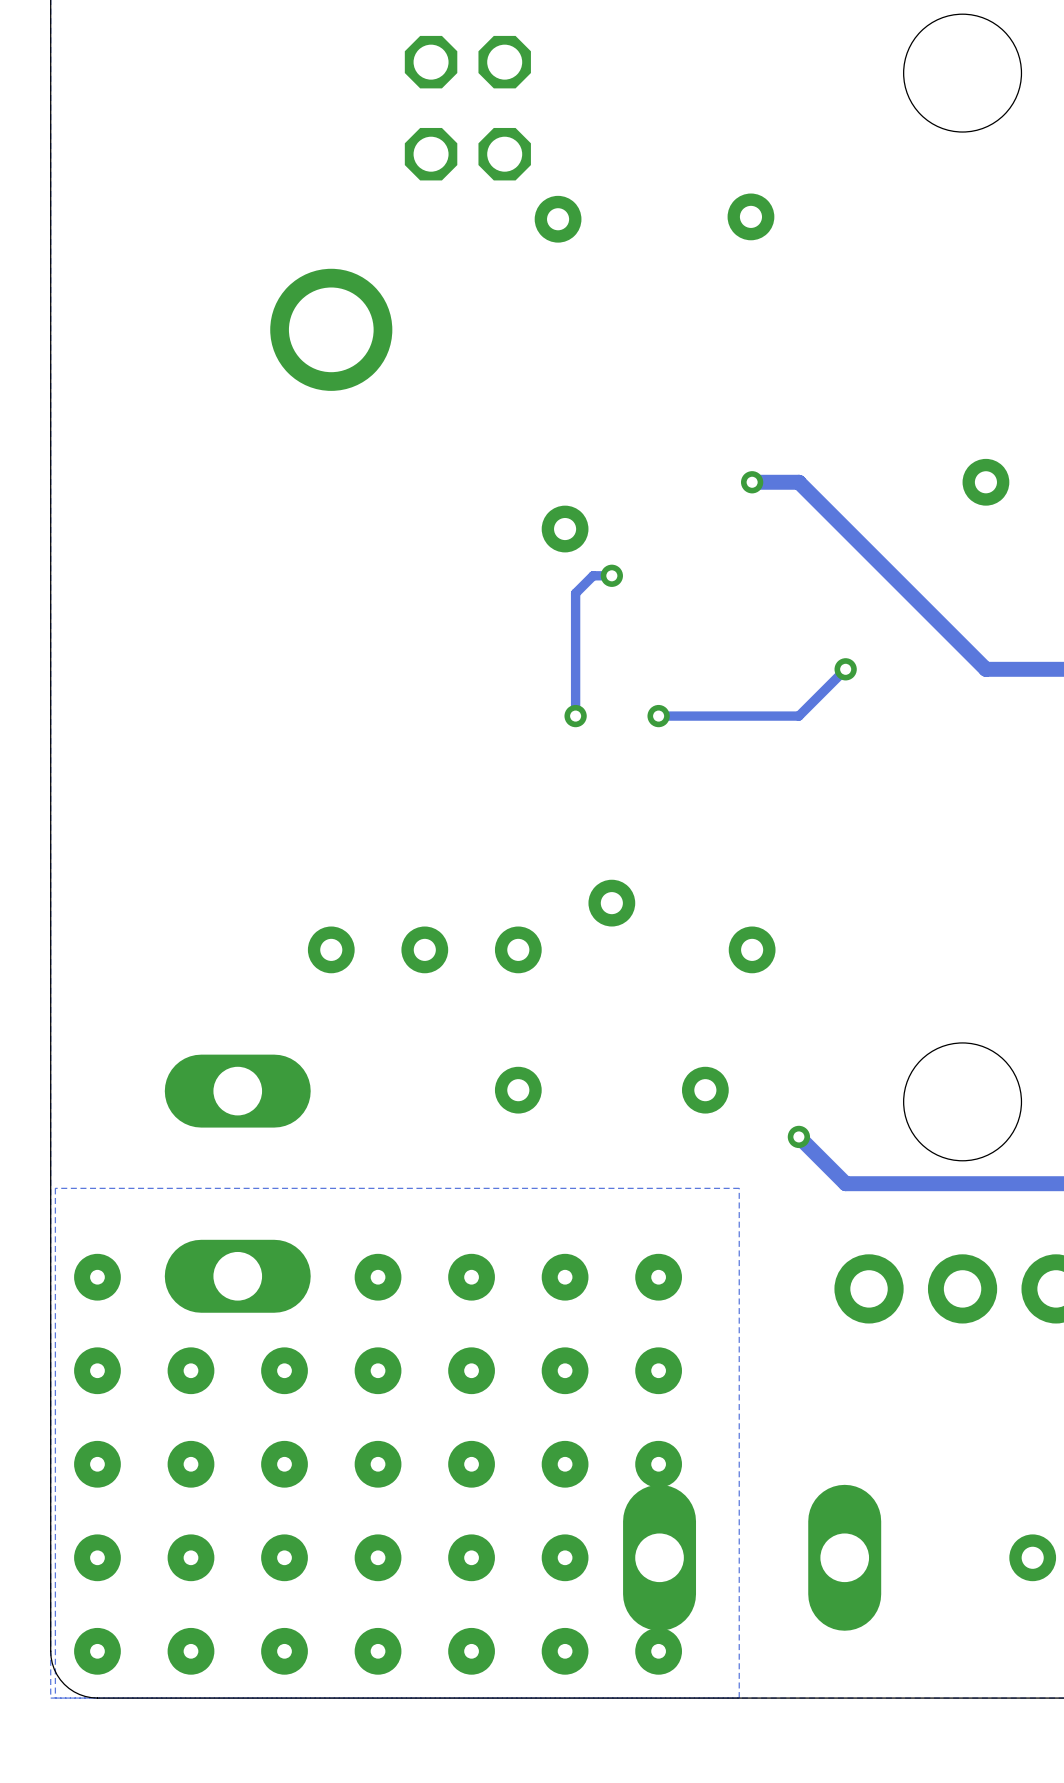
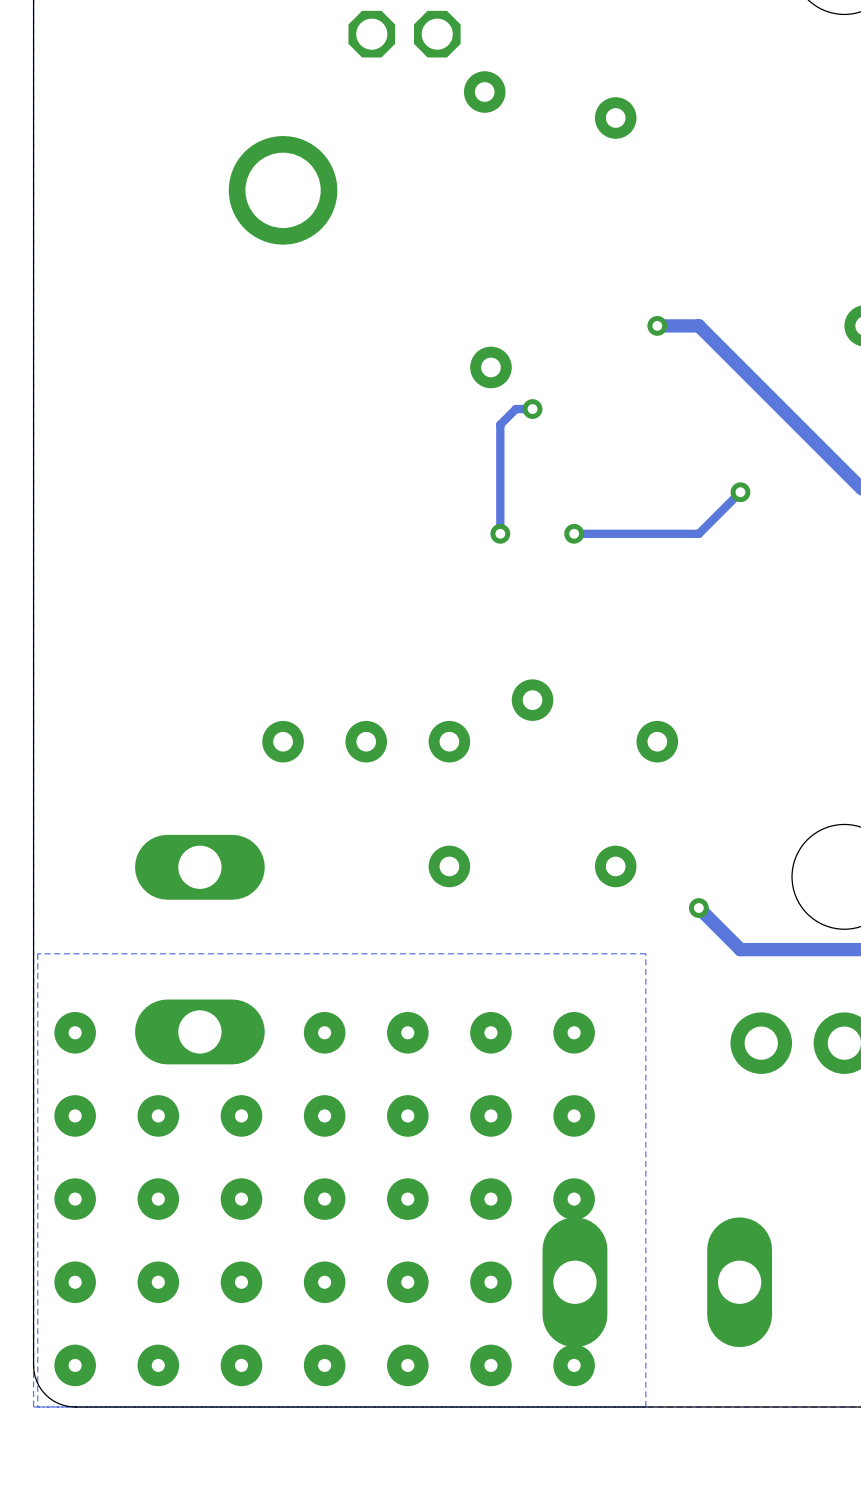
via position: (750, 216) -> (615, 117)

